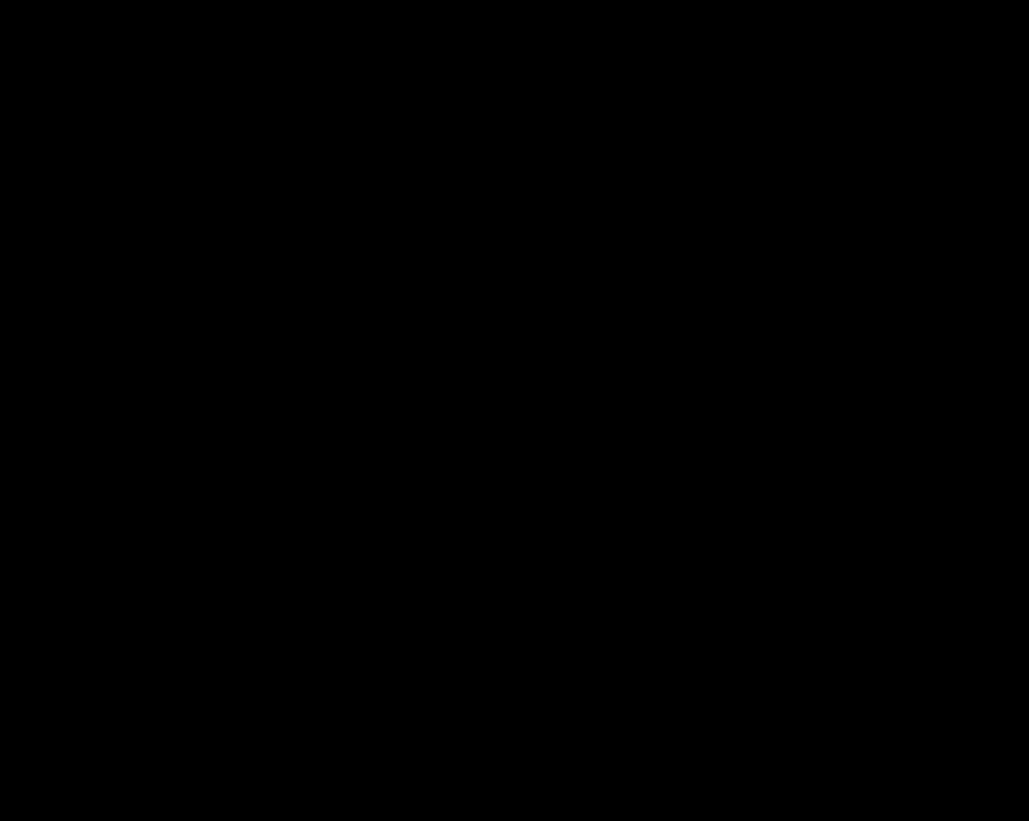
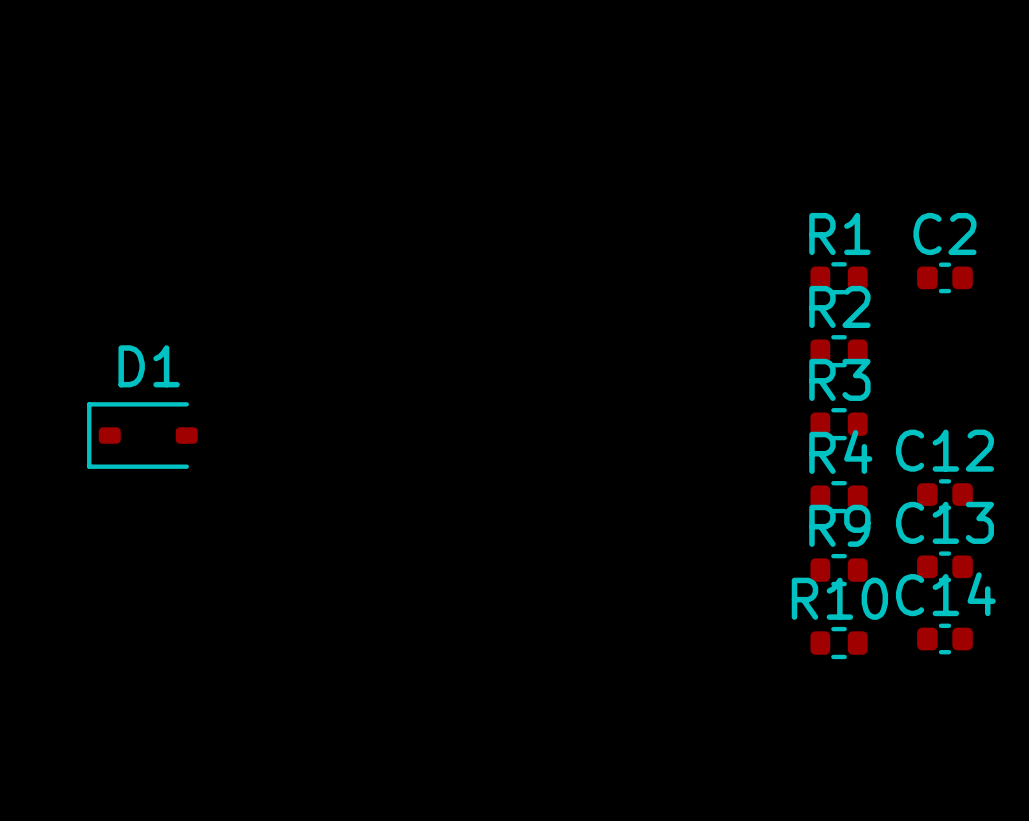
C2: none -> (944, 277)
R1: none -> (839, 278)
R2: none -> (839, 351)
R3: none -> (839, 424)
D1: none -> (142, 435)
C12: none -> (944, 494)
R4: none -> (839, 497)
C13: none -> (944, 566)
R9: none -> (839, 570)
C14: none -> (944, 638)
R10: none -> (839, 643)

